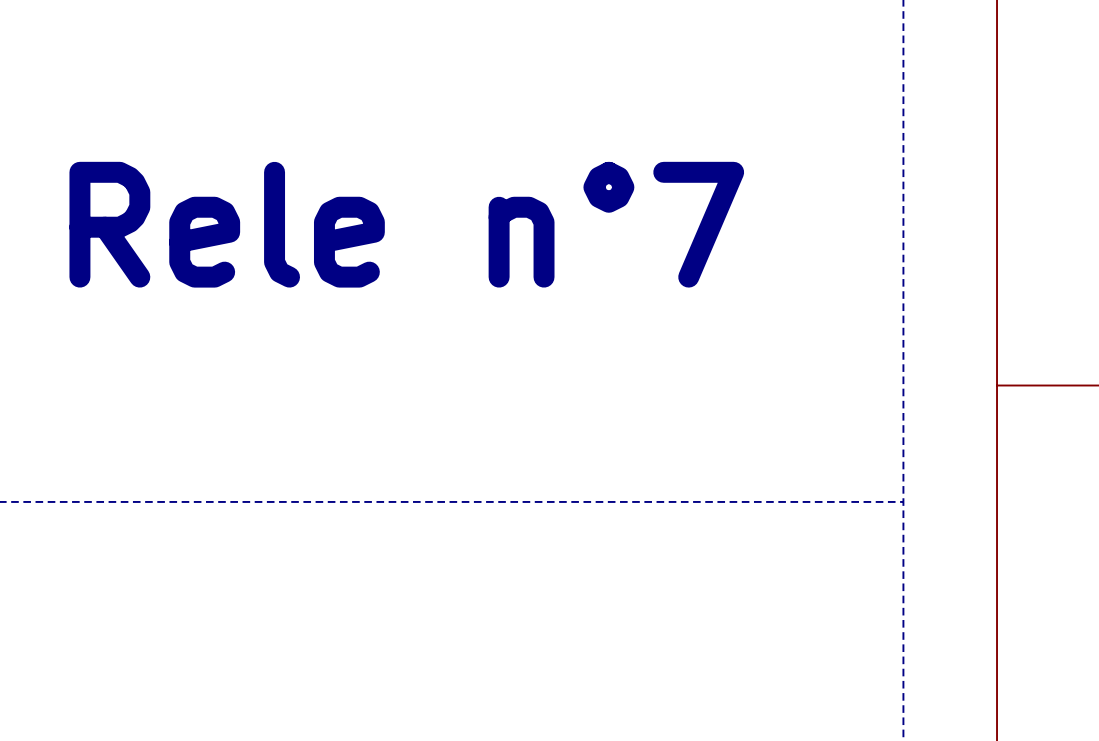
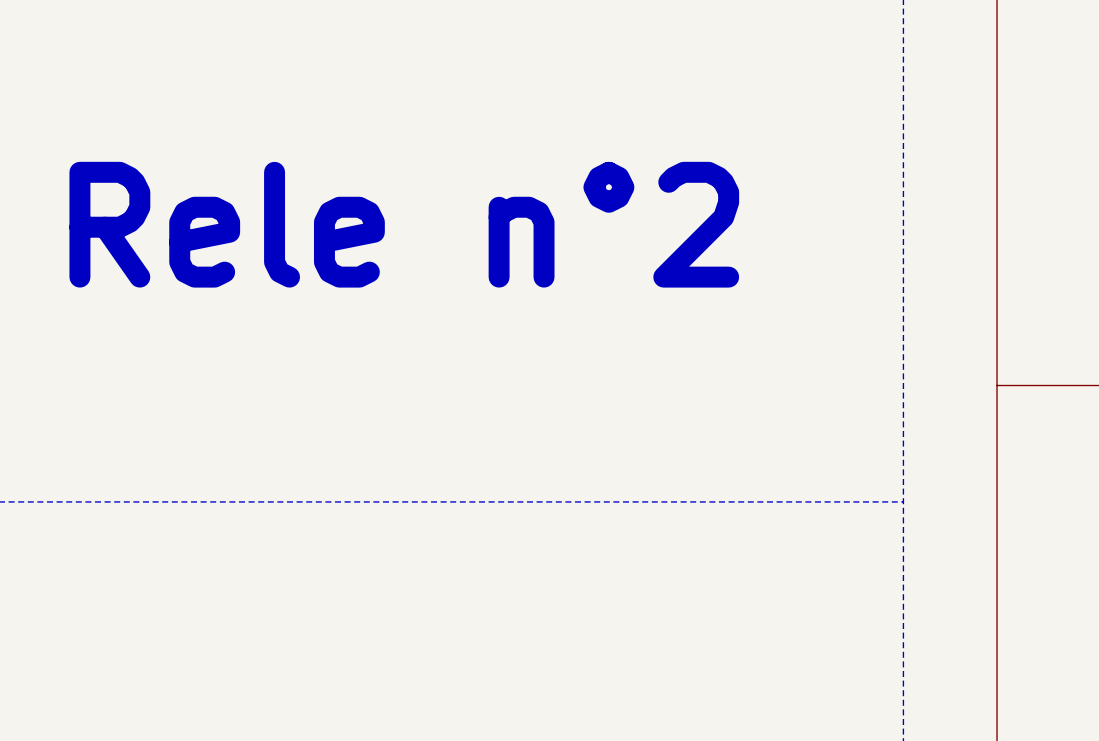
text: Rele n°7 (406, 224) -> Rele n°2 (404, 224)

